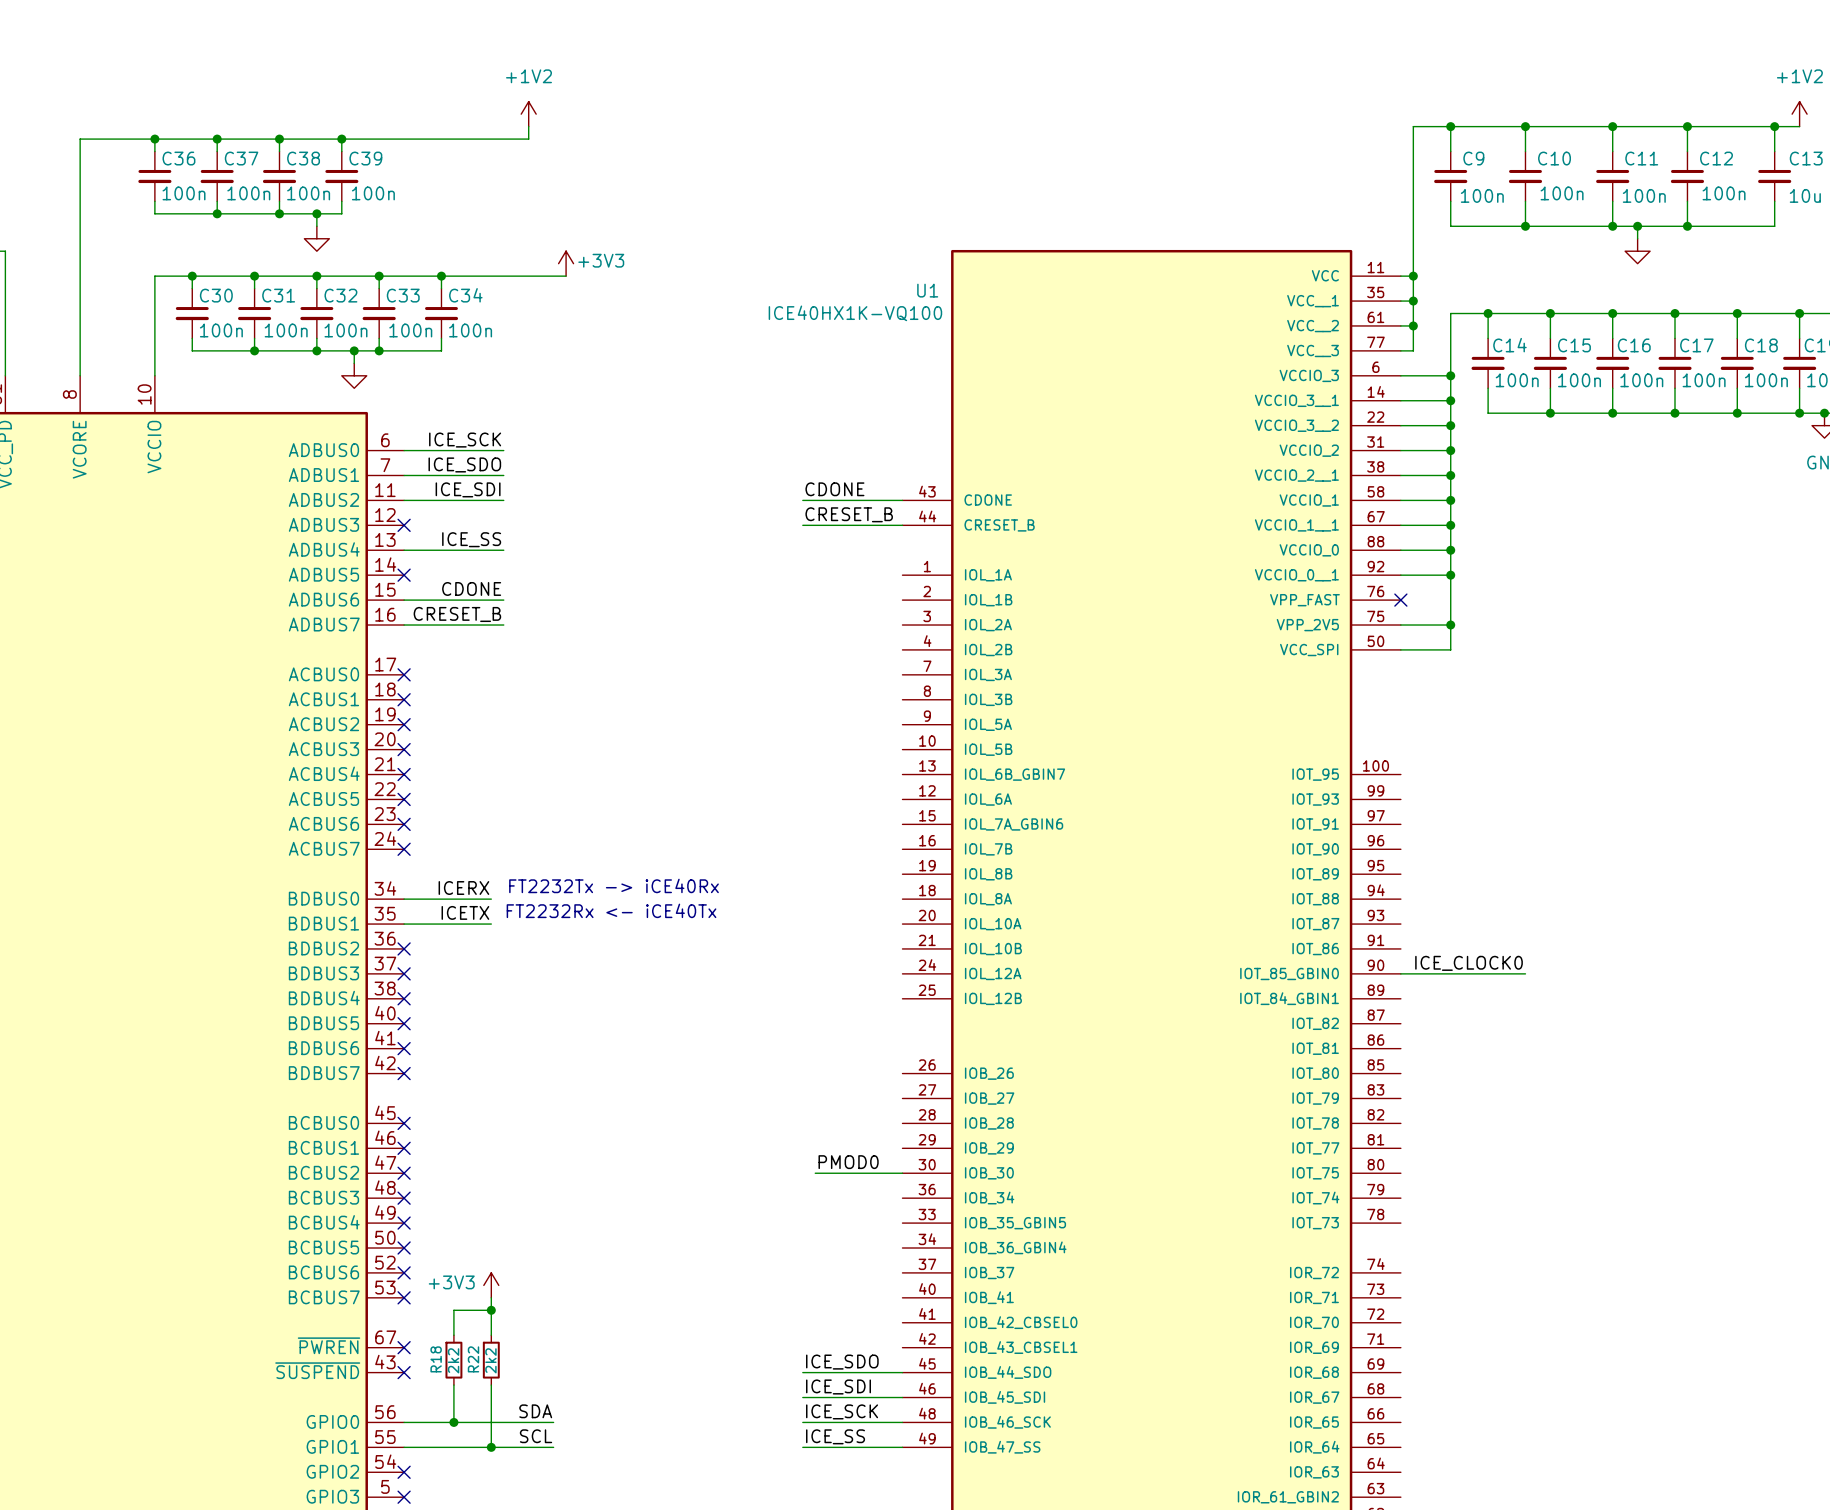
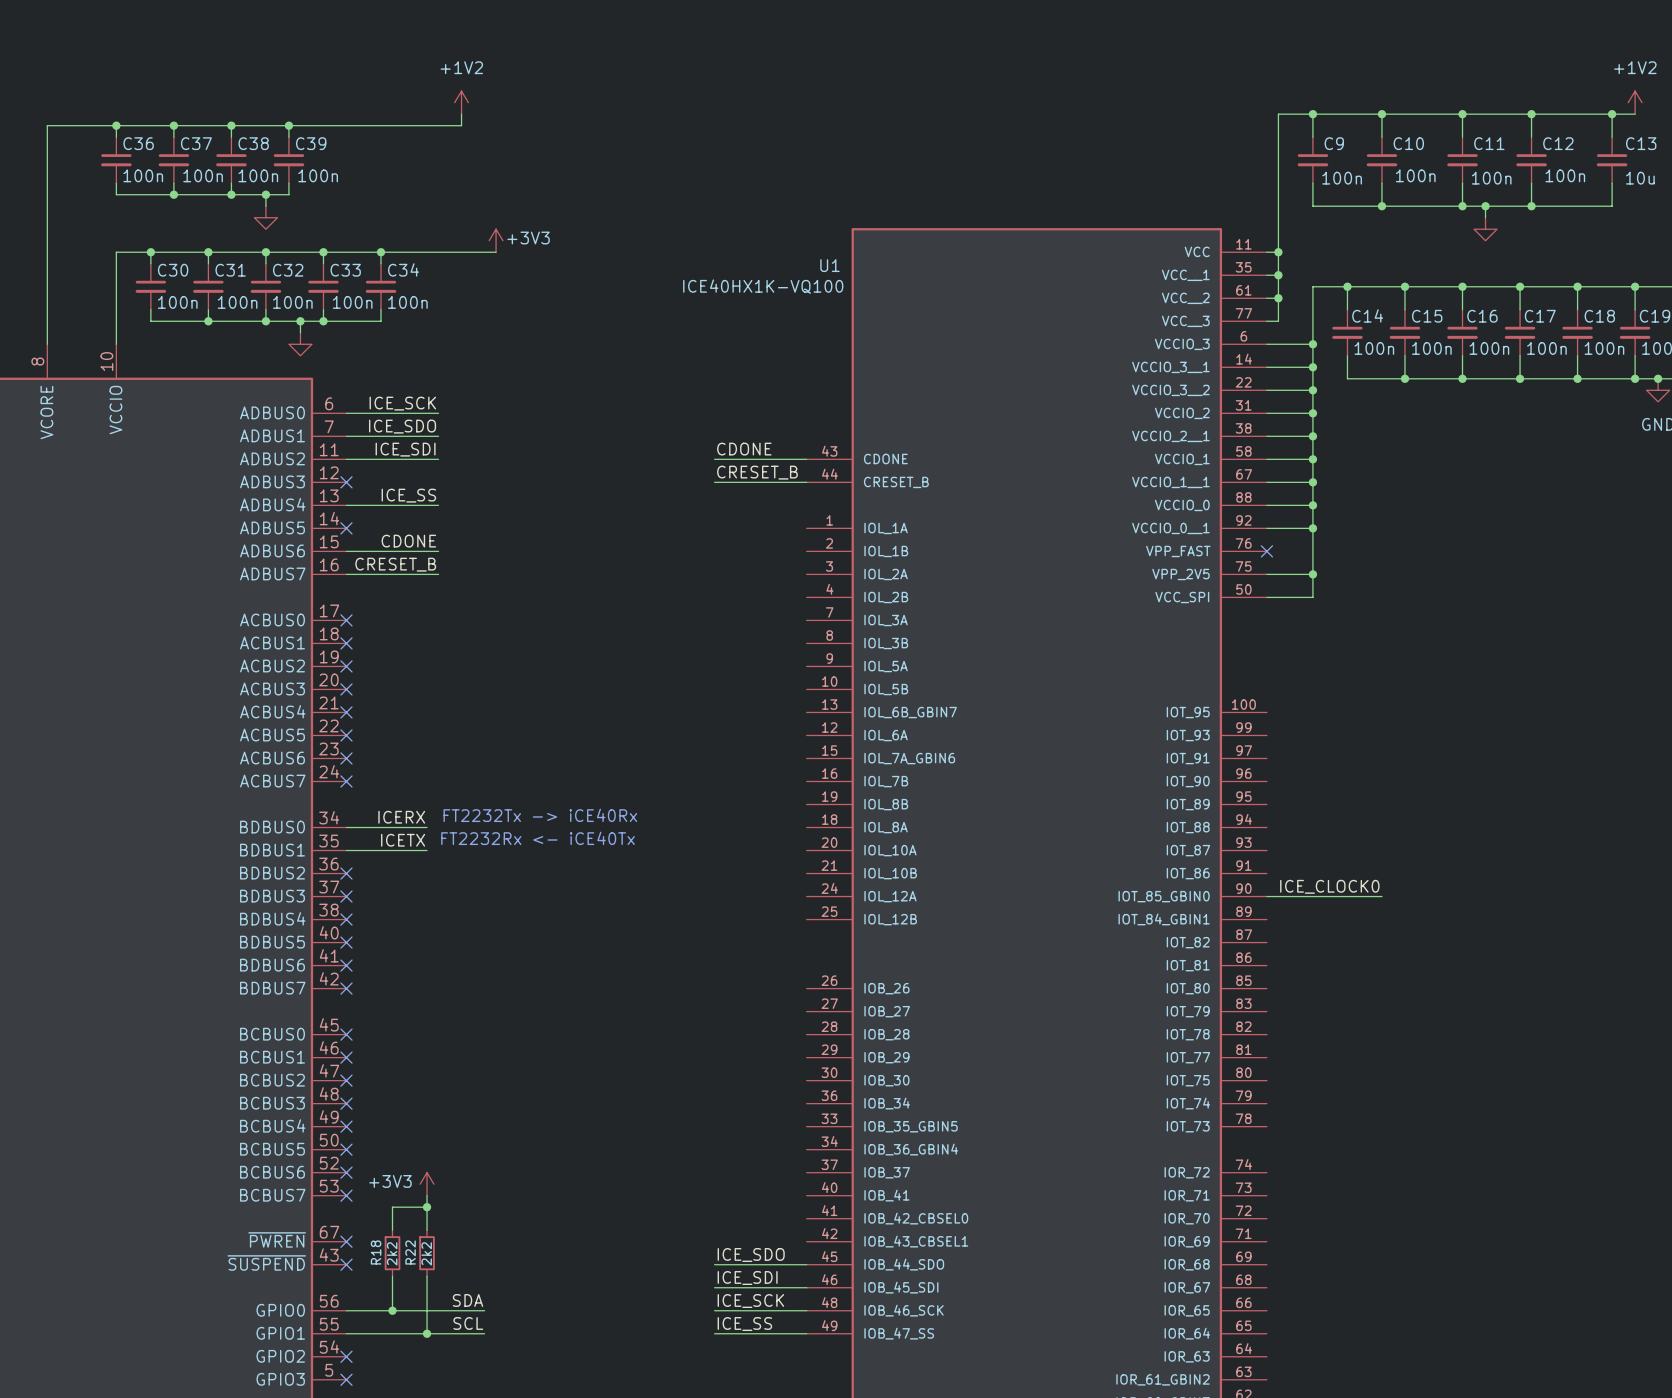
label: PMOD0 (848, 1162) -> none
wire: (815, 1173) (902, 1173) -> none

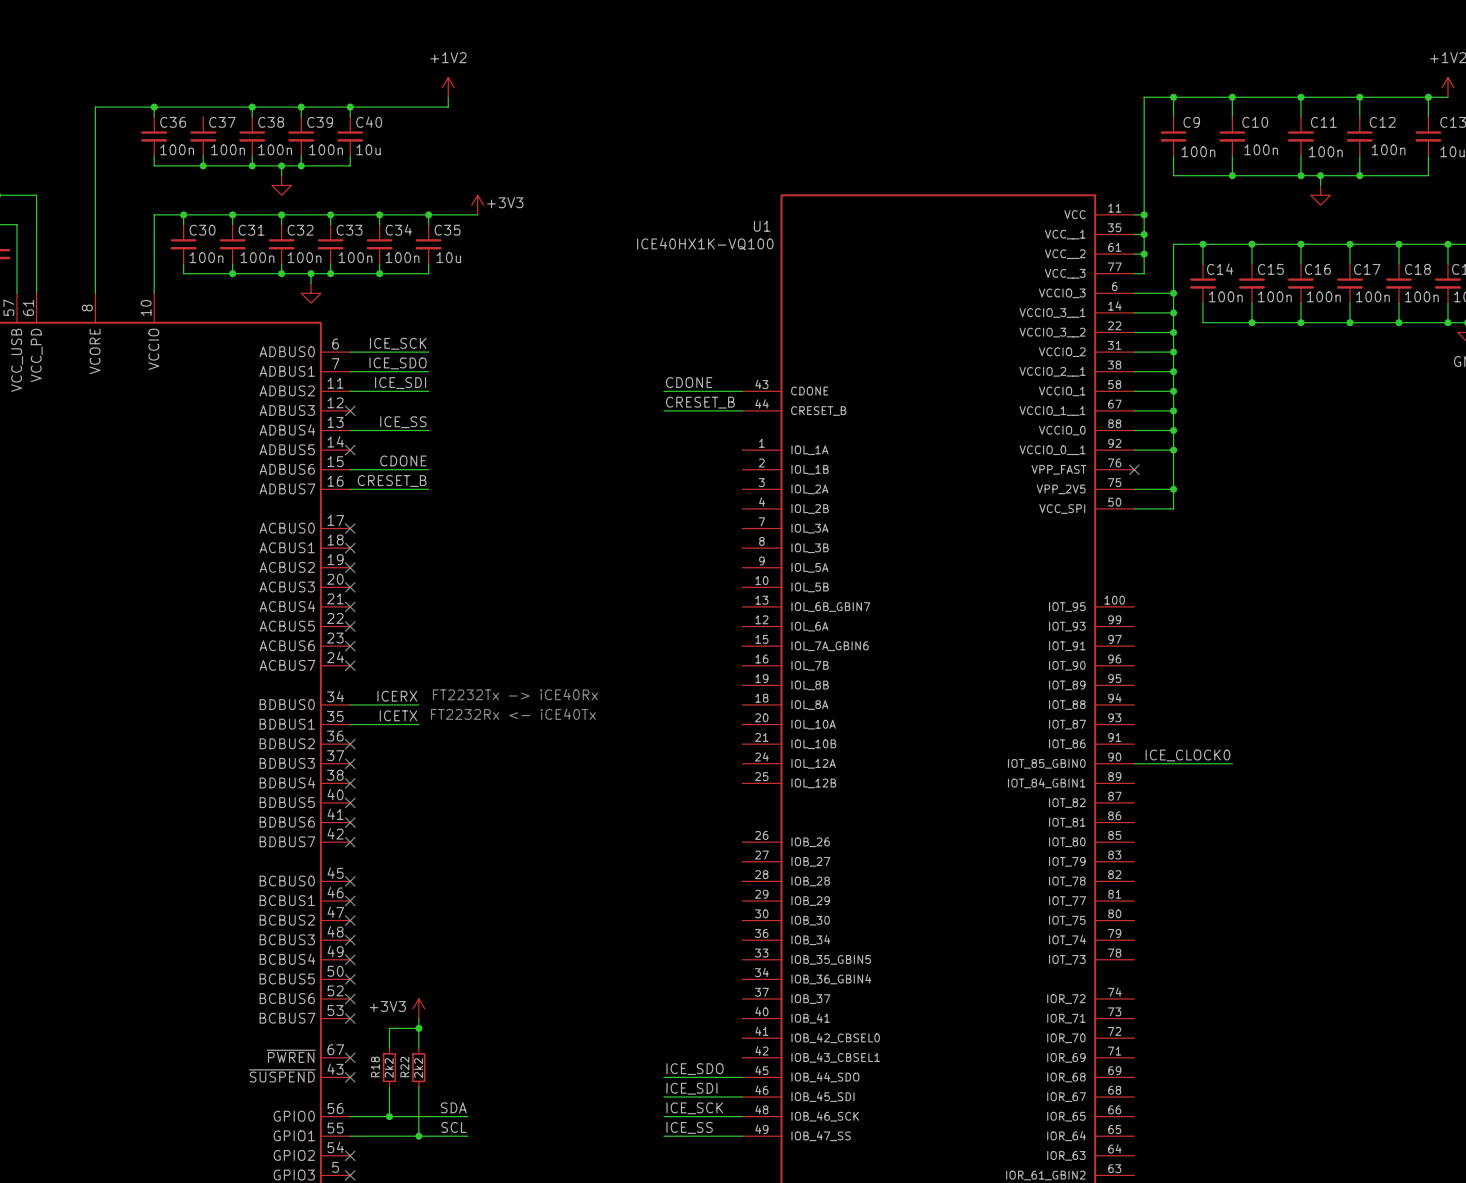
wire: (173, 125) (173, 137) -> (350, 107) (350, 116)
junction: (173, 125) -> none
junction: none -> (350, 107)
C40: none -> 10u (350, 136)
wire: none -> (350, 156) (350, 165) (301, 165)
junction: none -> (301, 165)
wire: none -> (428, 214) (428, 224)
junction: none -> (428, 214)
C35: none -> 10u (428, 244)
wire: none -> (428, 263) (428, 273) (379, 273)
junction: none -> (379, 273)

